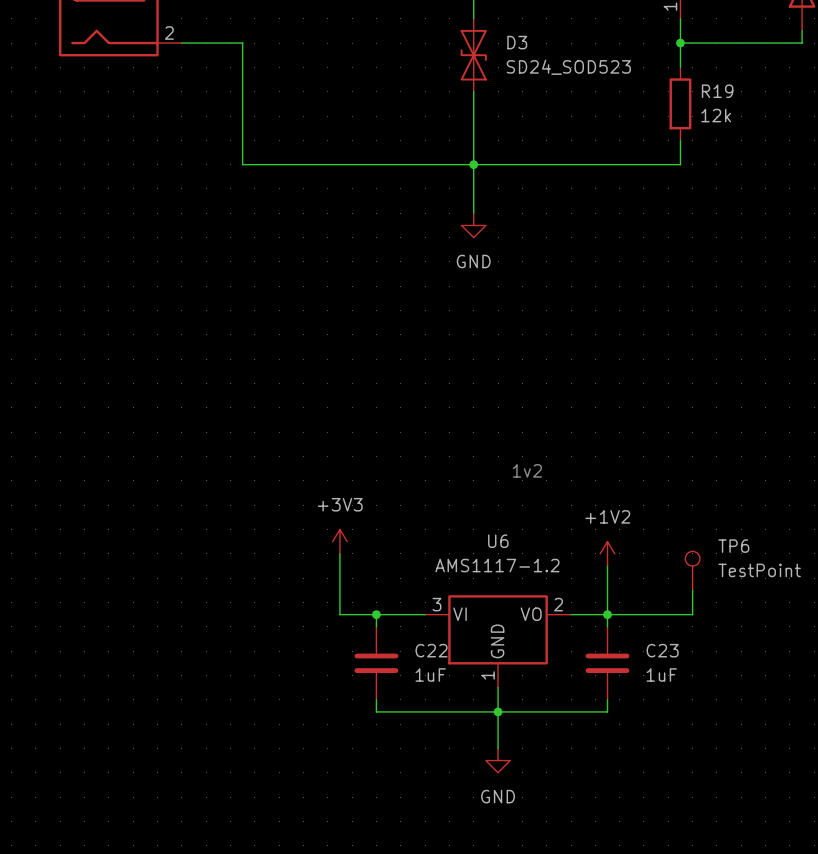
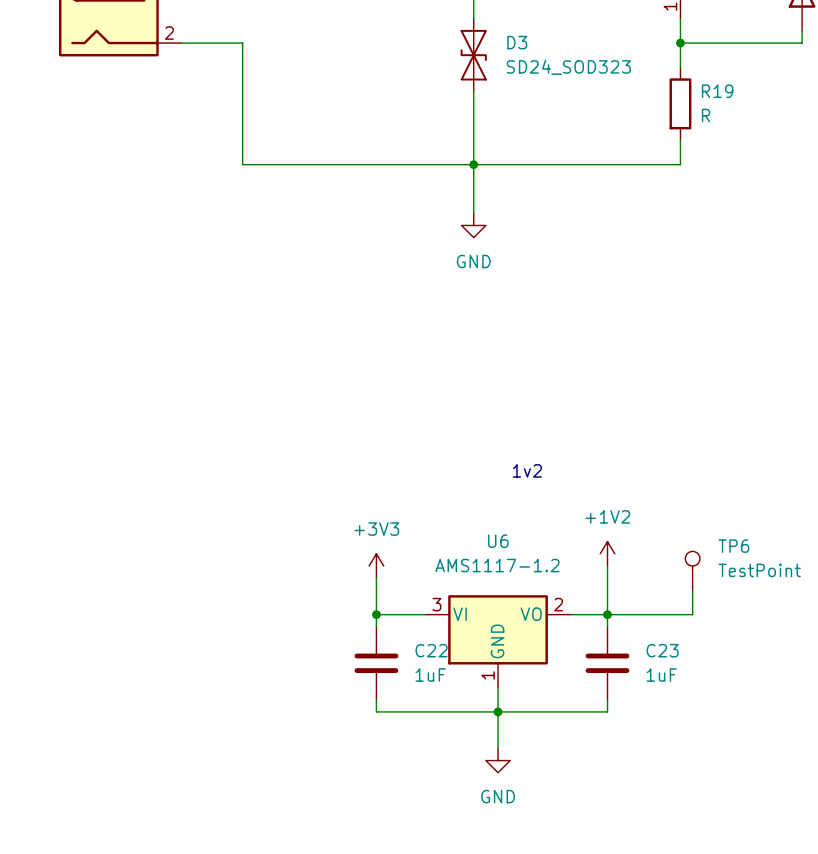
D3 value: SD24_SOD523 (568, 67) -> SD24_SOD323 (568, 67)
R19 value: 12k (716, 115) -> R (706, 115)
power symbol position: +3V3 (339, 541) -> +3V3 (376, 566)
wire: (339, 553) (339, 614) (376, 614) -> (376, 578) (376, 614)

